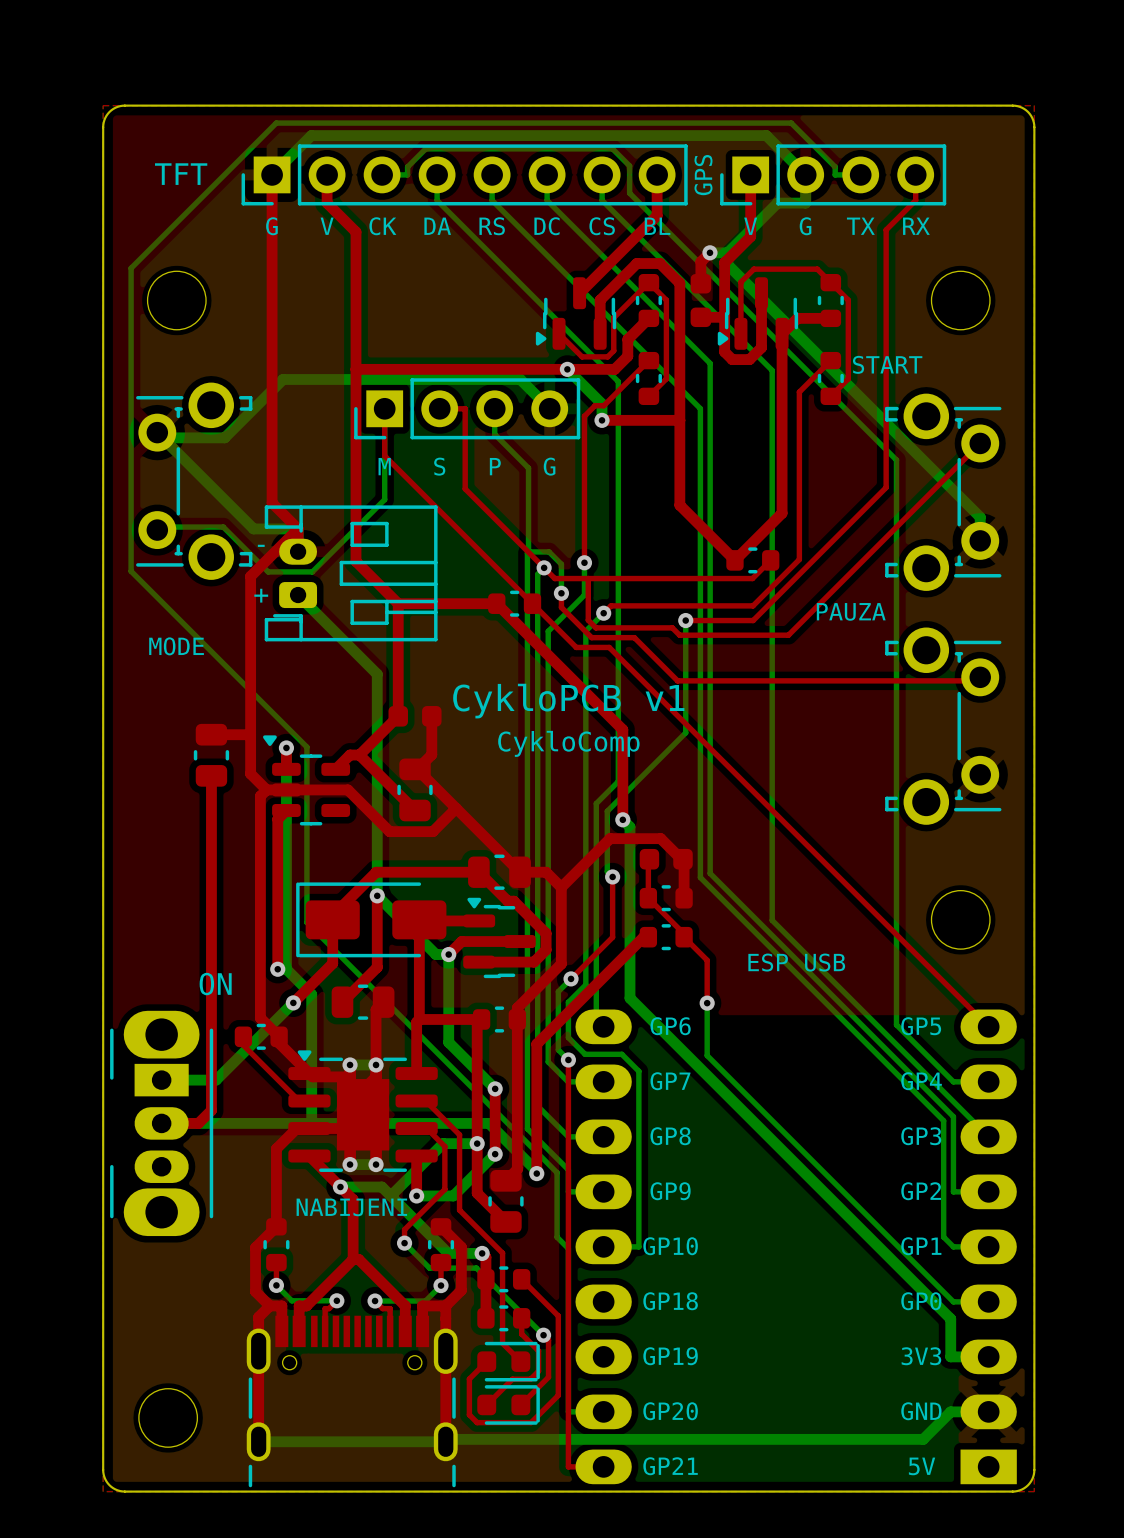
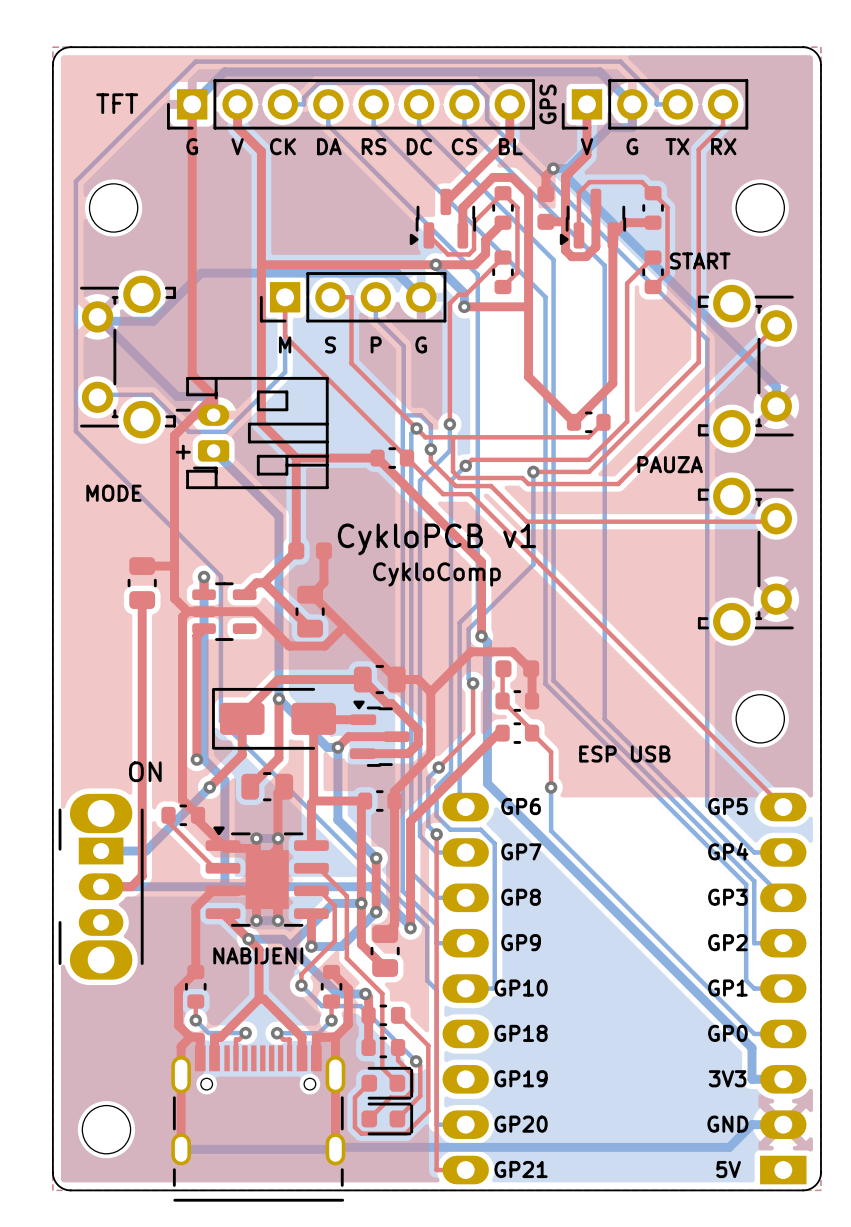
part footprint: [263, 735, 351, 826] -> [192, 582, 257, 641]
part footprint: [246, 1315, 458, 1488] -> [171, 1045, 346, 1202]

